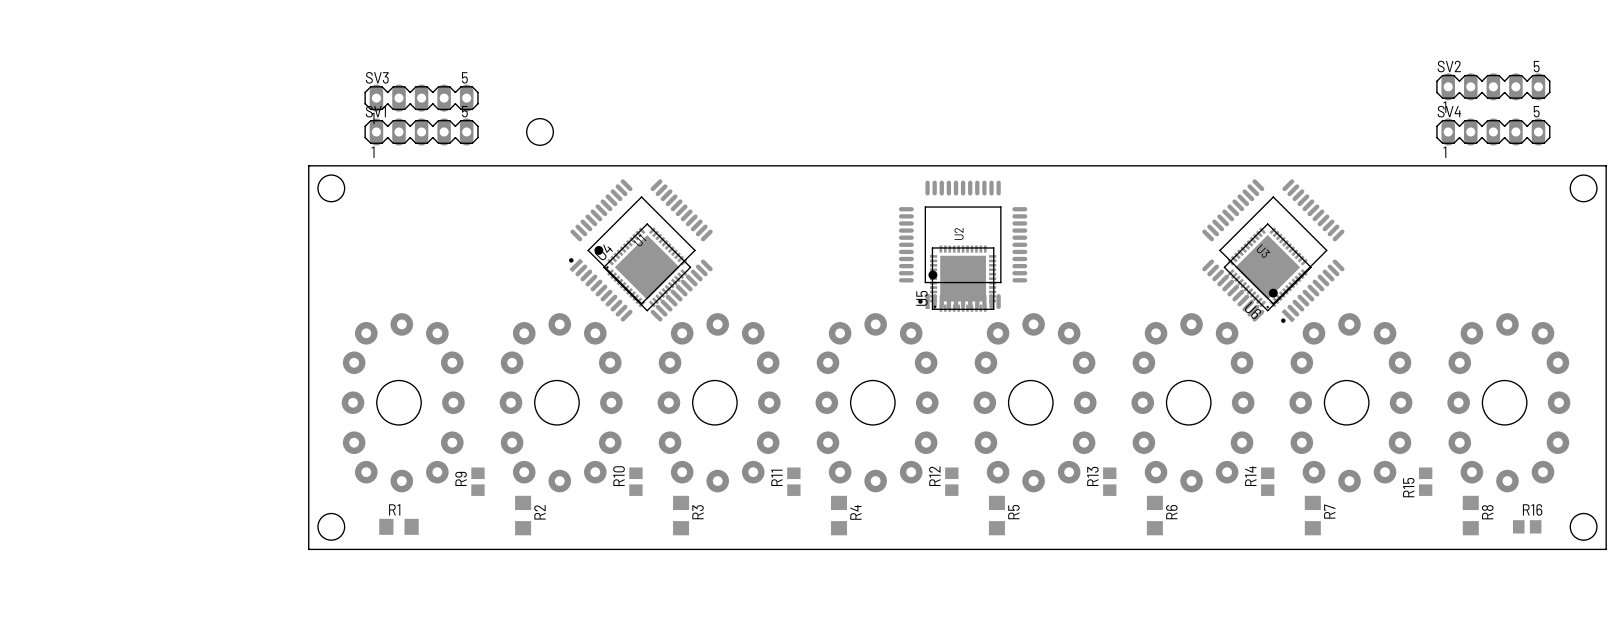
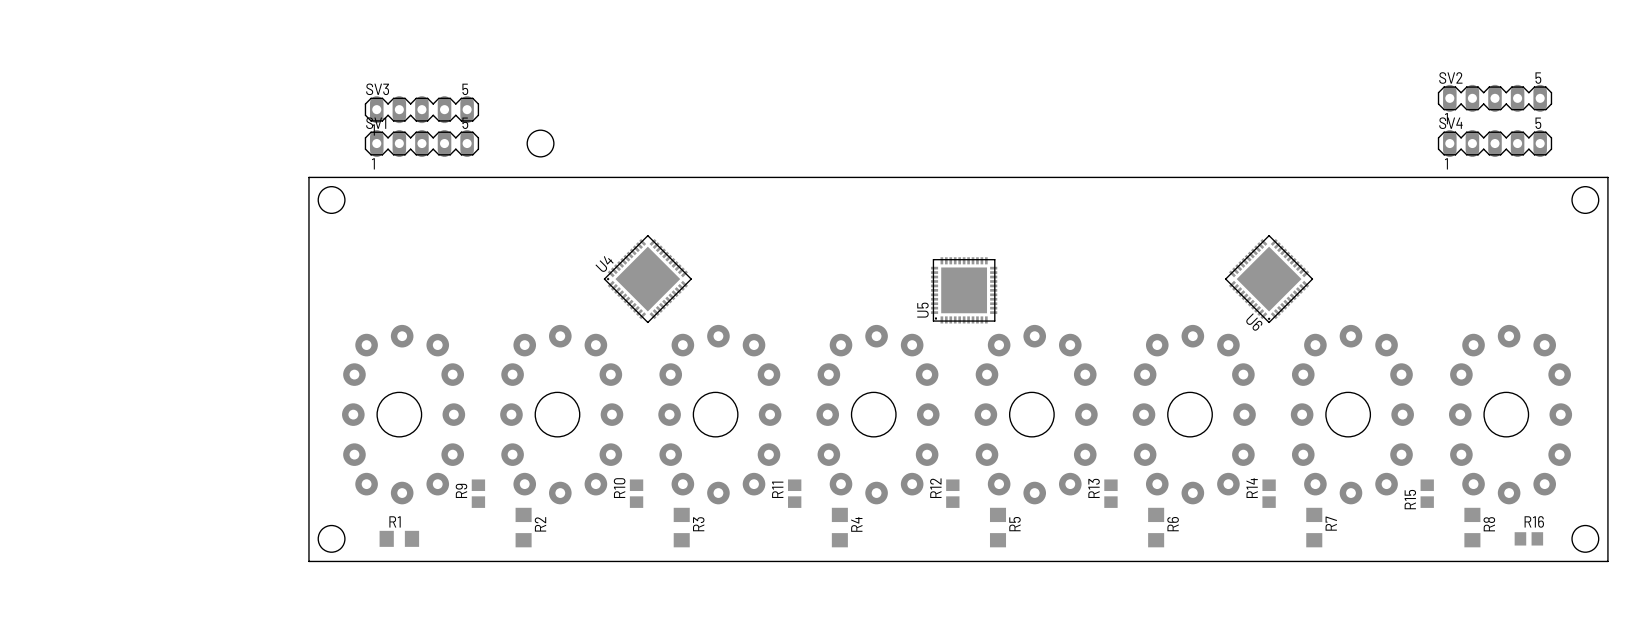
U2: (963, 244) -> none
U1: (640, 250) -> none
U3: (1273, 251) -> none

